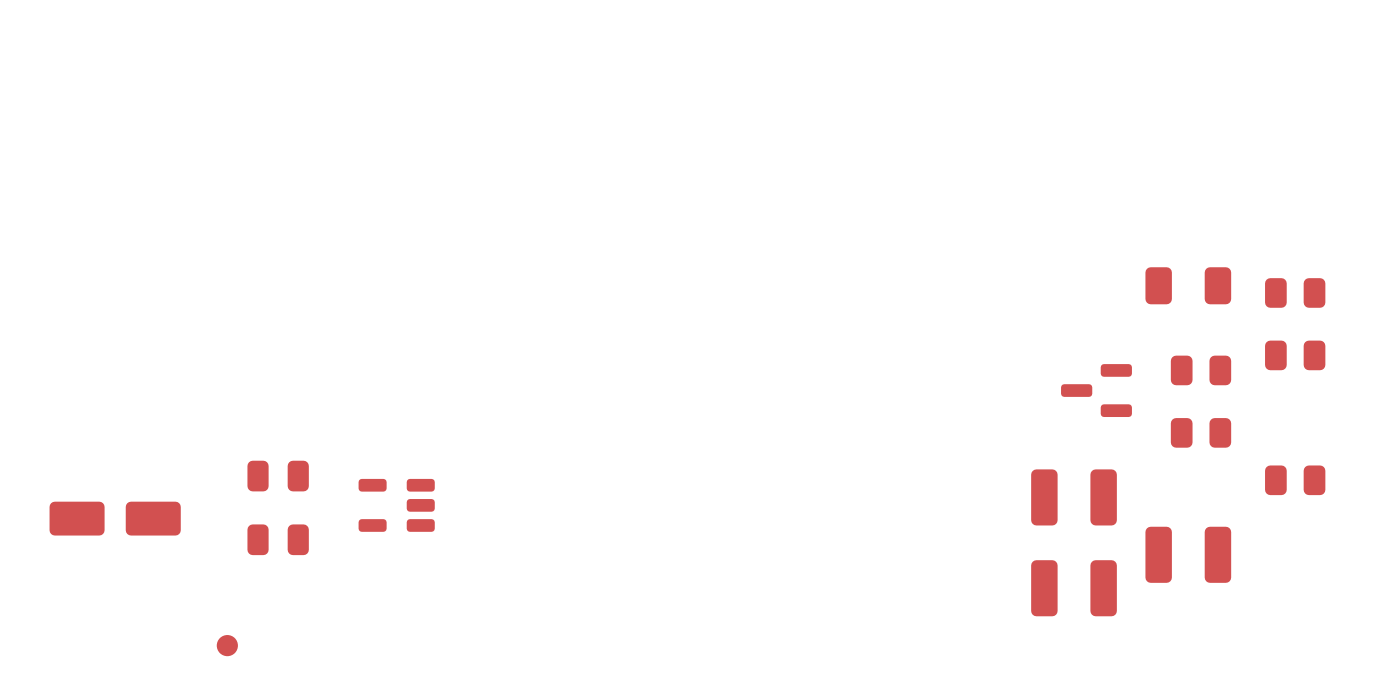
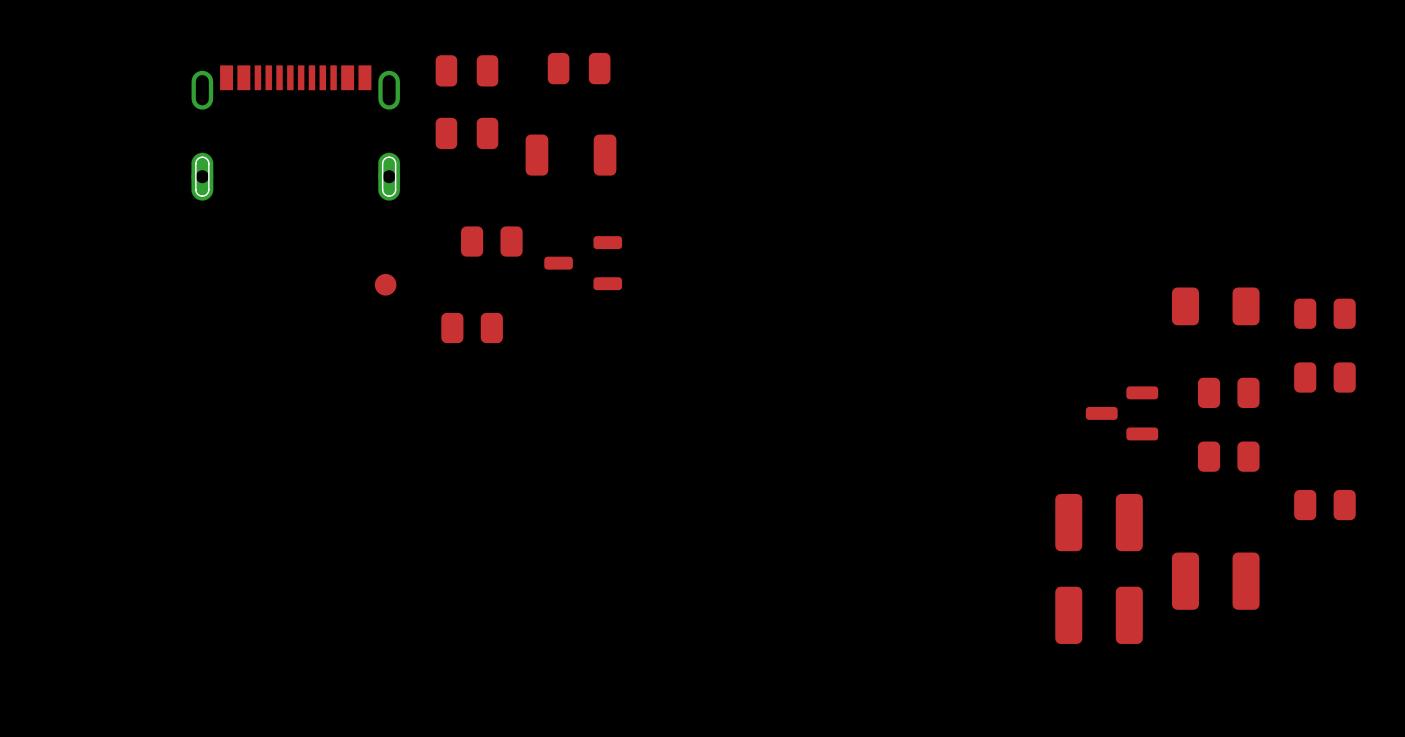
part: none -> (579, 68)
part: none -> (466, 70)
part: none -> (295, 132)
part: none -> (466, 133)
part: none -> (571, 155)
part: none -> (491, 241)
part: none -> (583, 263)
part: none -> (472, 328)
part: (278, 476) -> none
part: (396, 505) -> none
part: (115, 518) -> none
part: (278, 539) -> none
part position: (227, 645) -> (385, 284)

